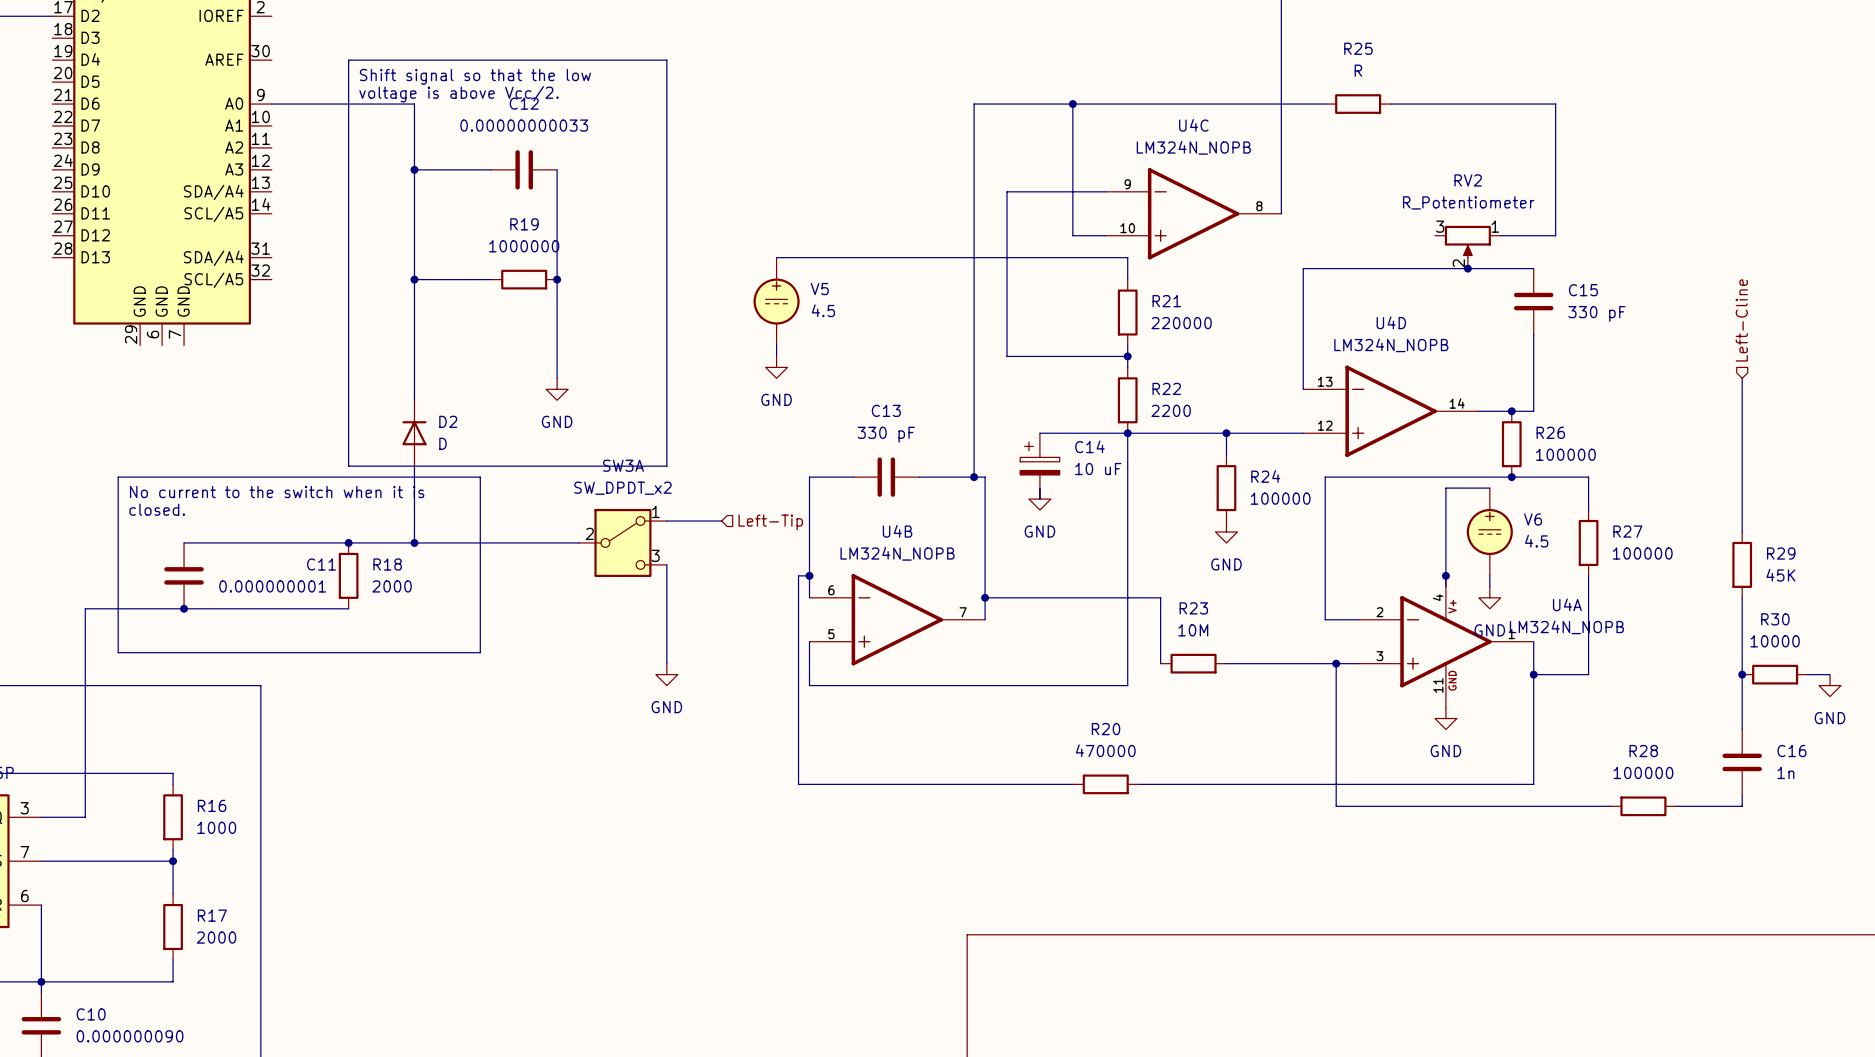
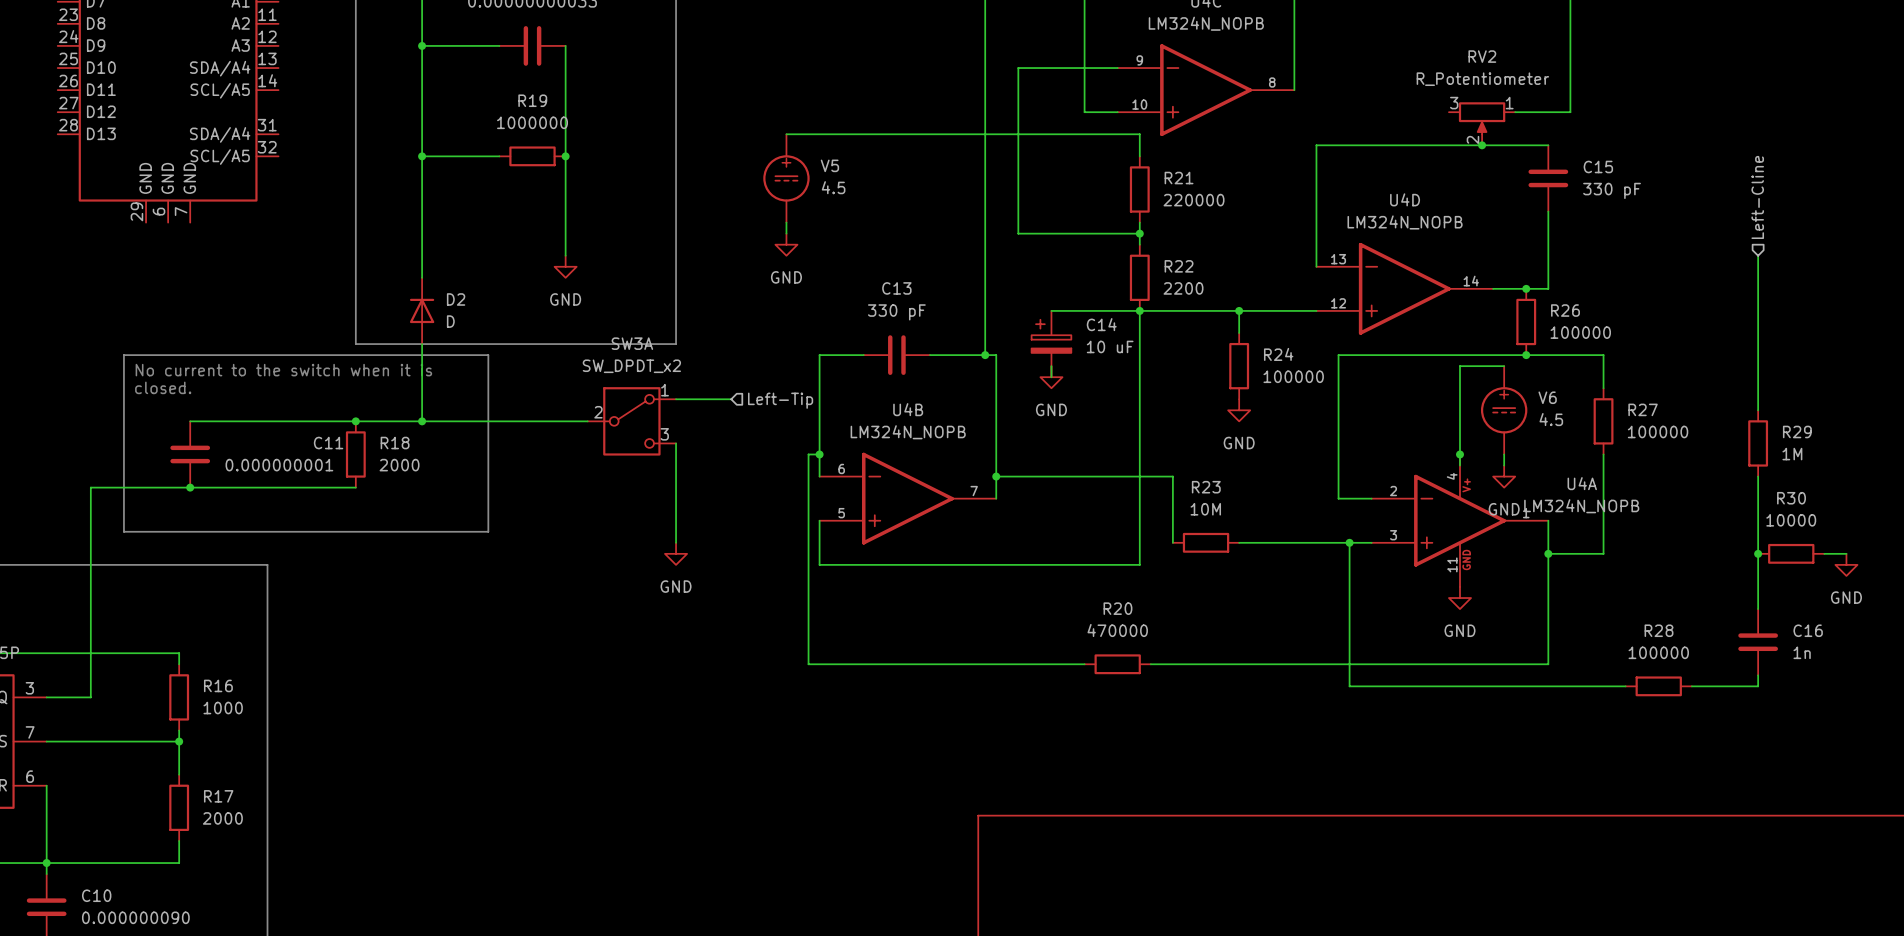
R29 value: 45K (1780, 575) -> 1M (1792, 454)

